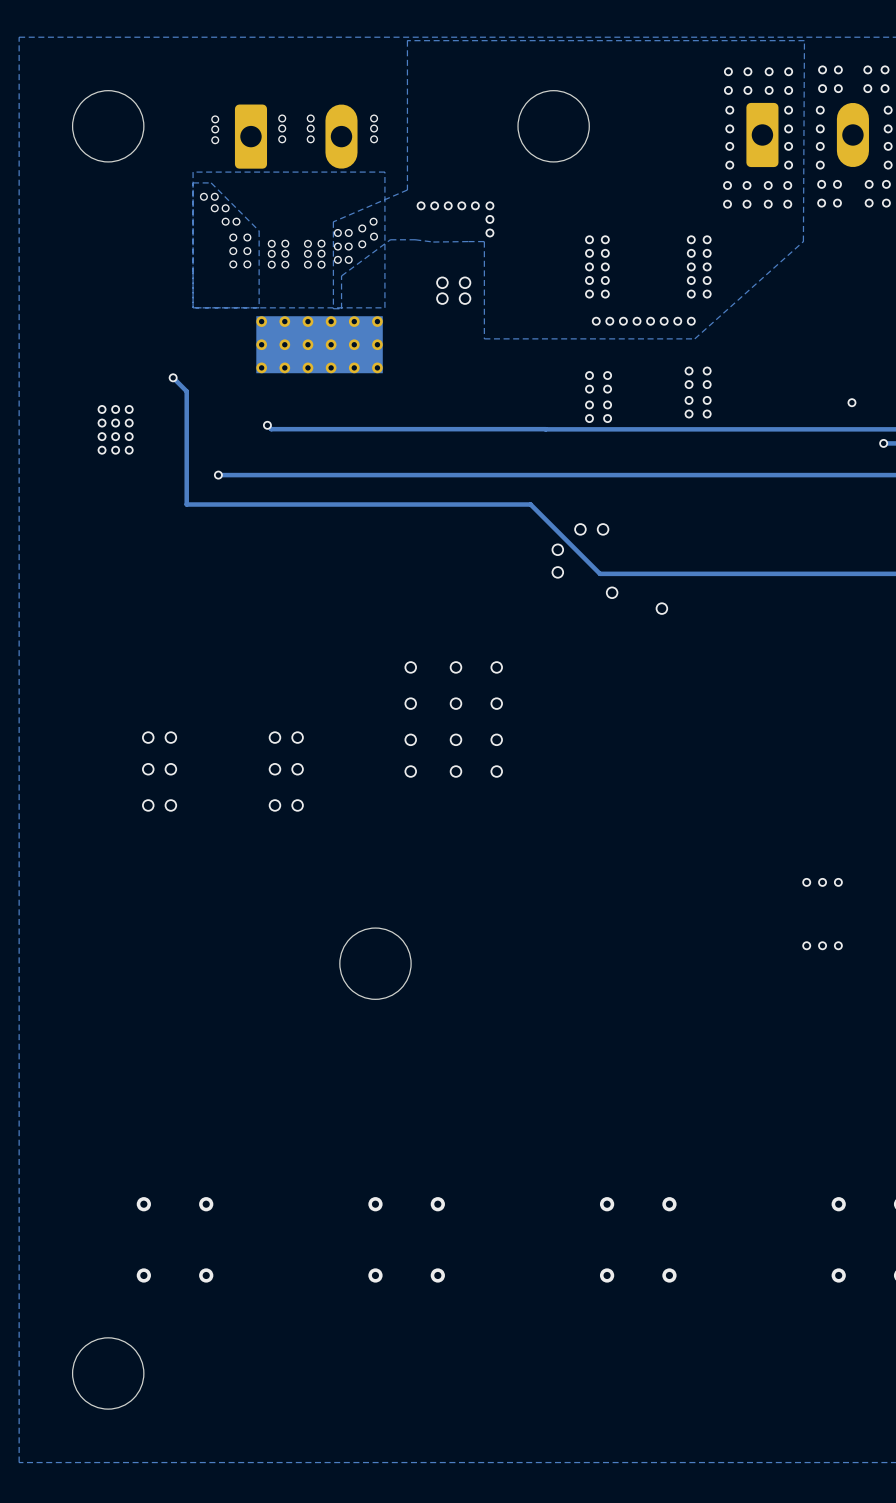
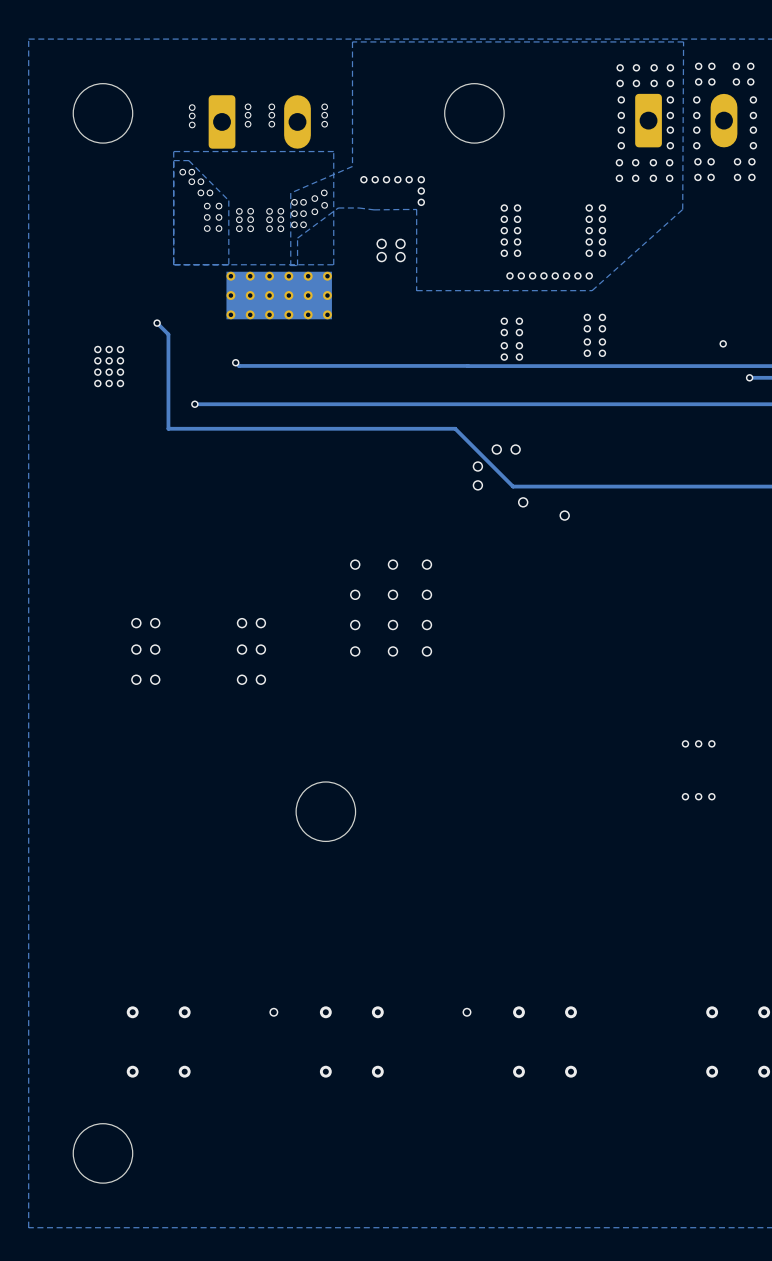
via: none -> (273, 1012)
via: none -> (466, 1012)

